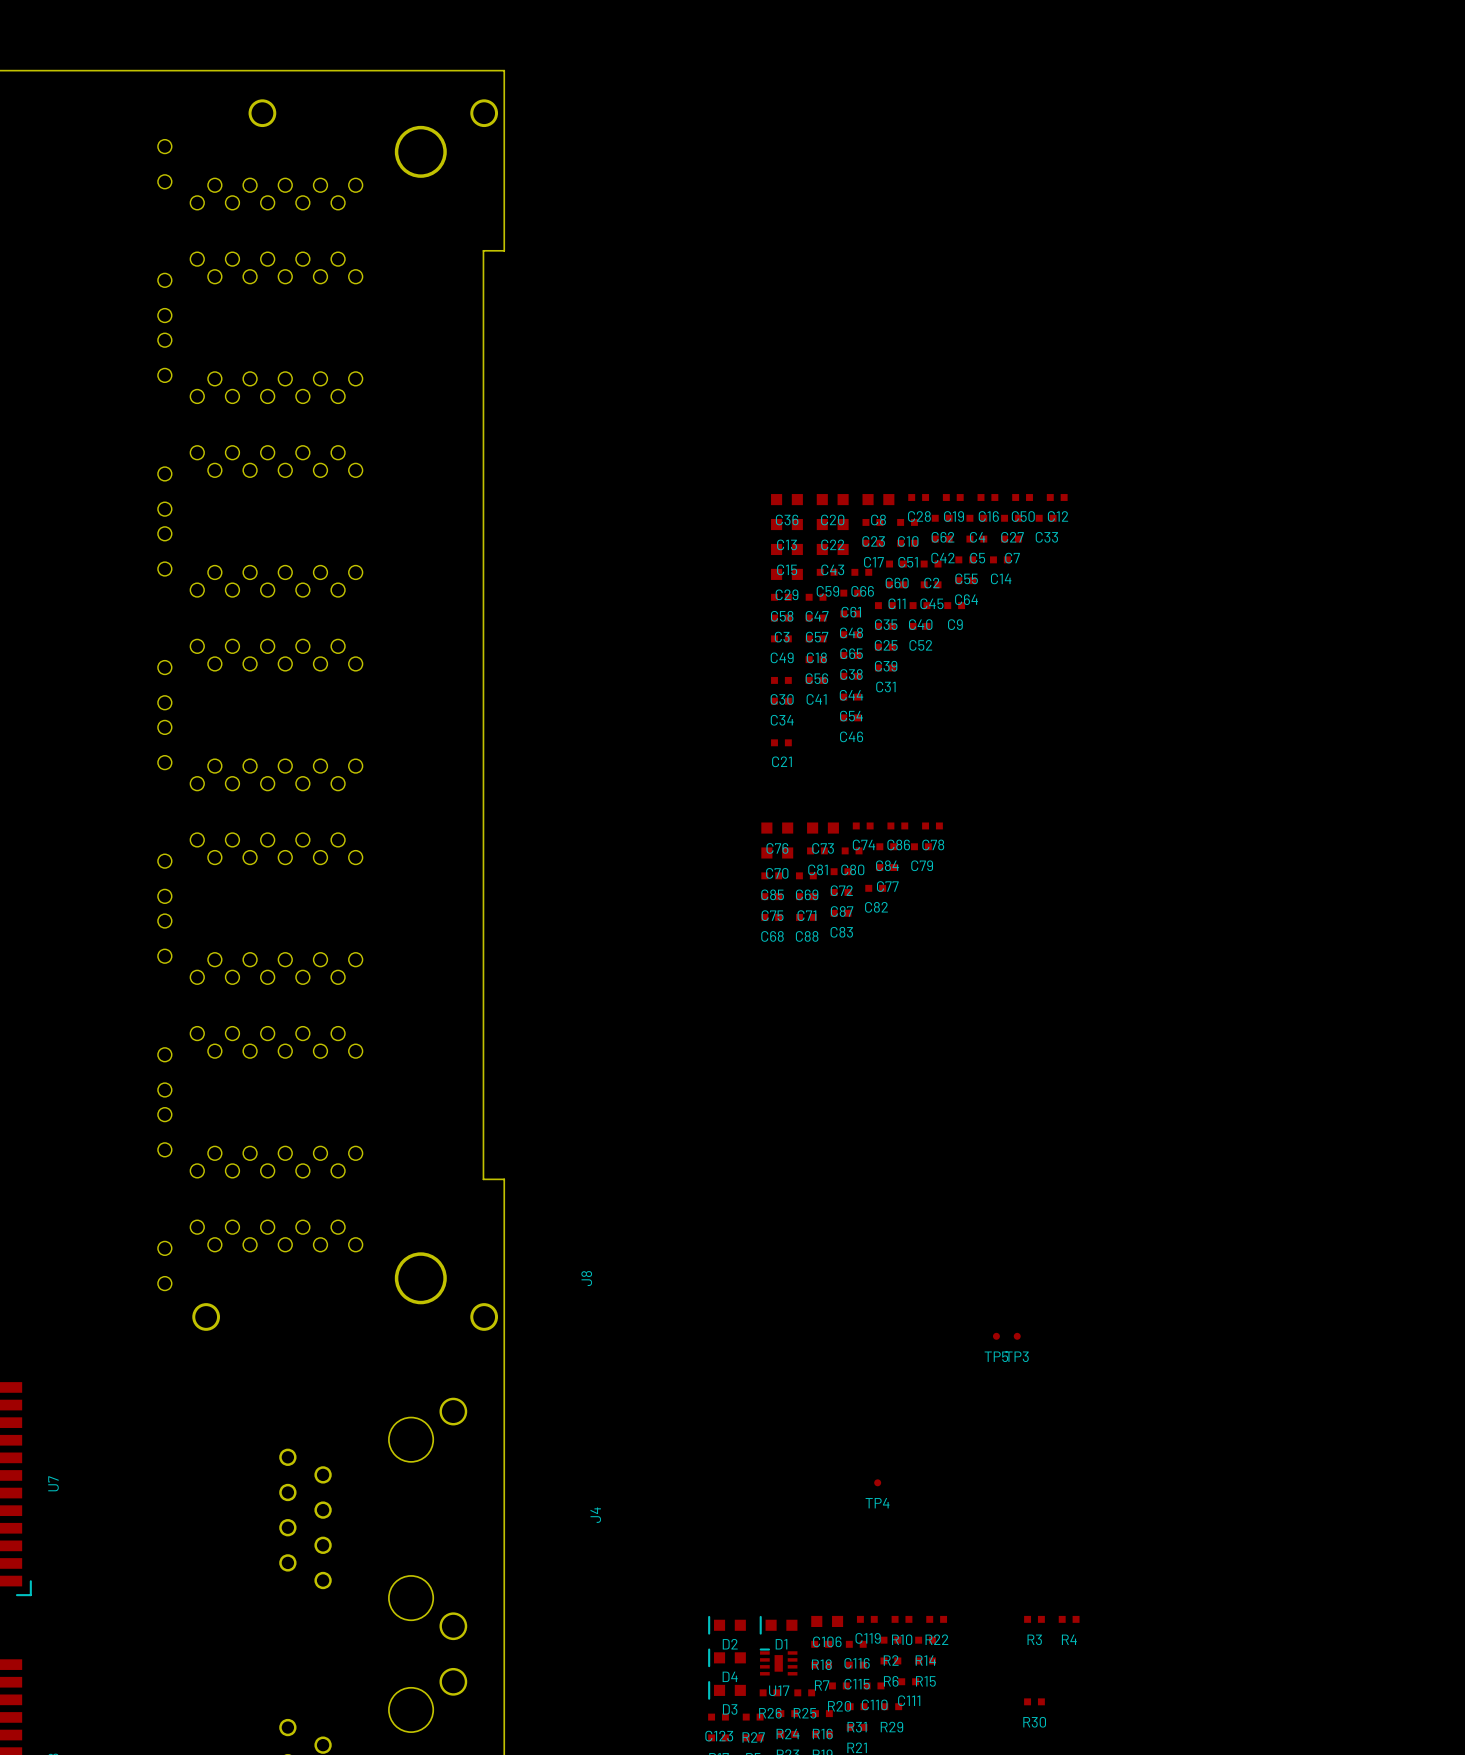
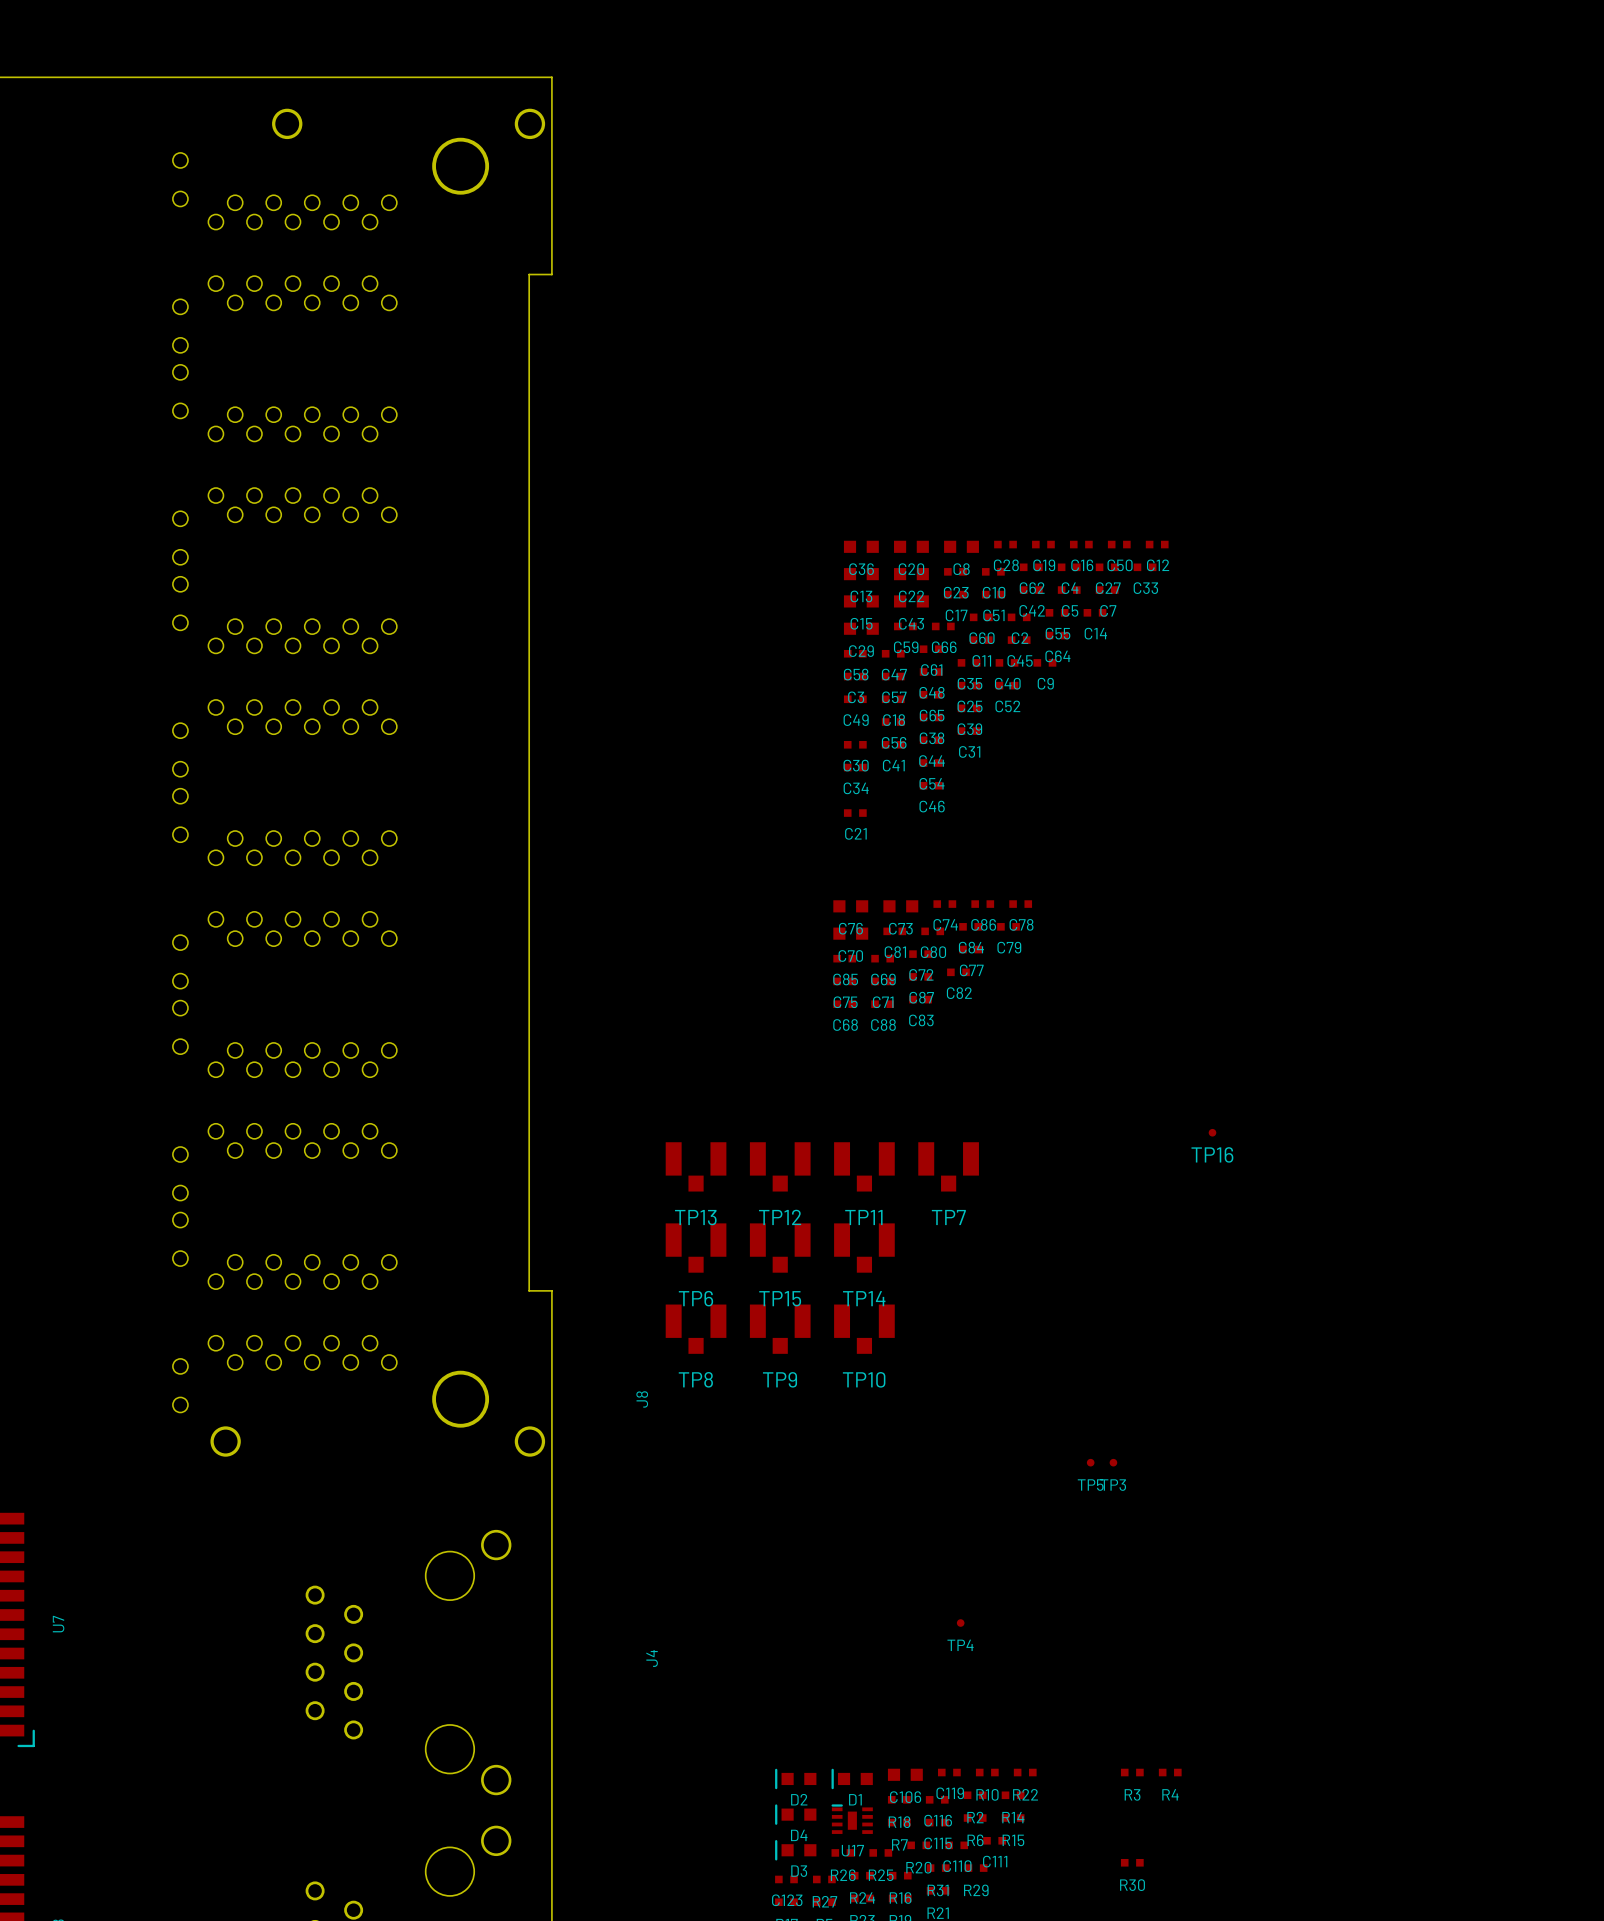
TP16: none -> (1212, 1132)
TP13: none -> (696, 1166)
TP12: none -> (780, 1166)
TP11: none -> (864, 1166)
TP7: none -> (948, 1166)
TP6: none -> (696, 1248)
TP15: none -> (780, 1248)
TP14: none -> (864, 1248)
TP8: none -> (696, 1329)
TP9: none -> (780, 1329)
TP10: none -> (864, 1329)

